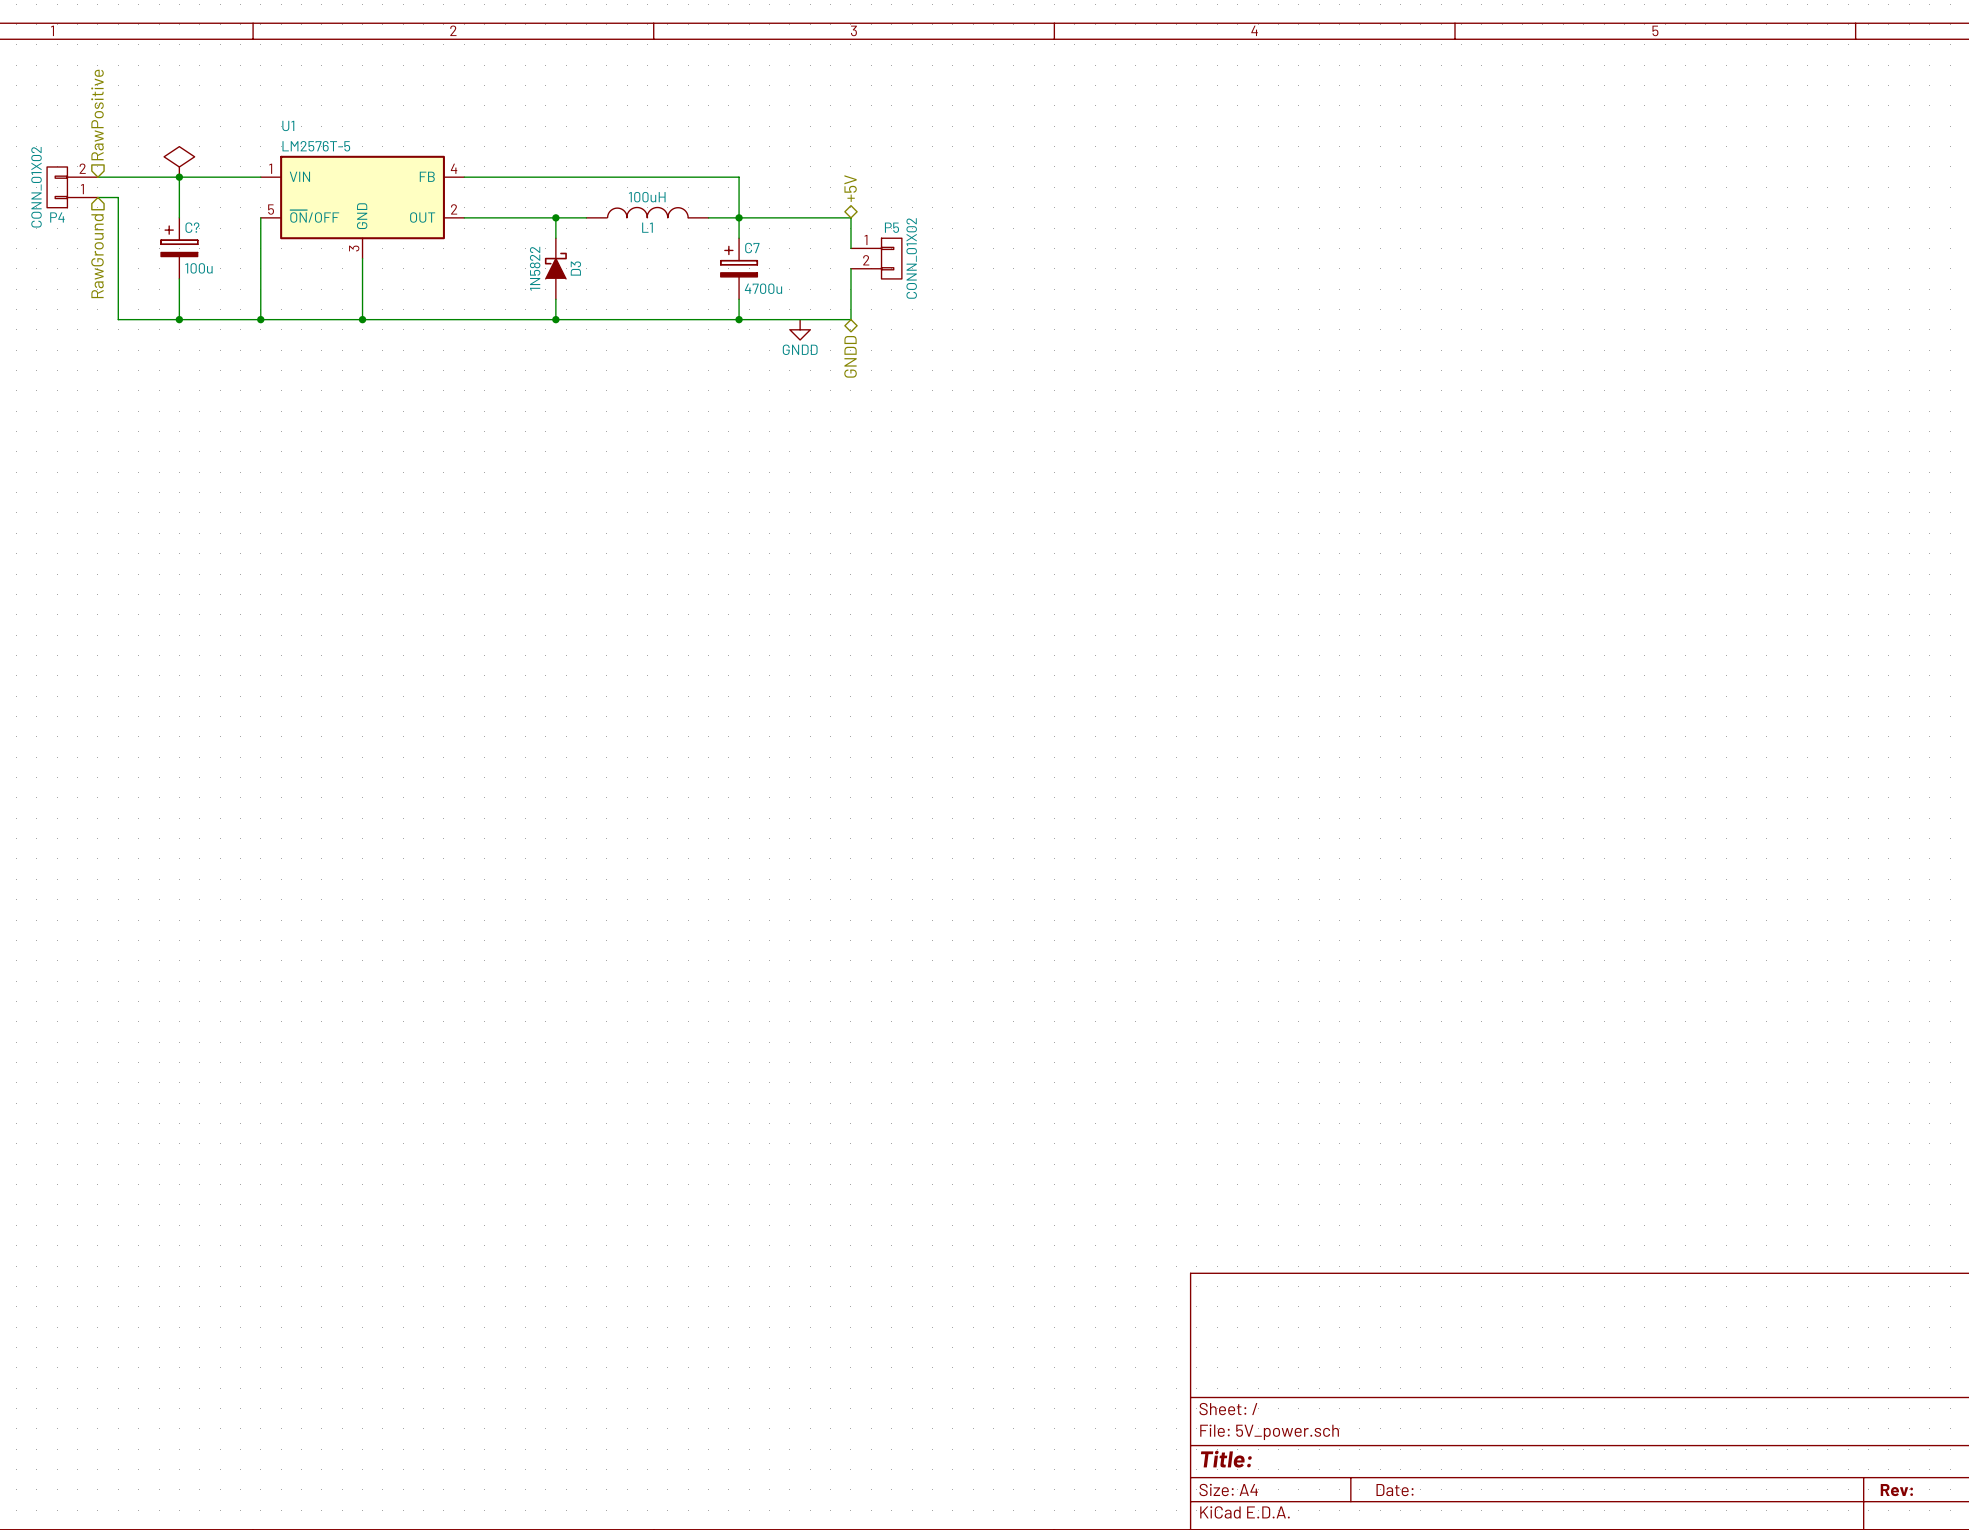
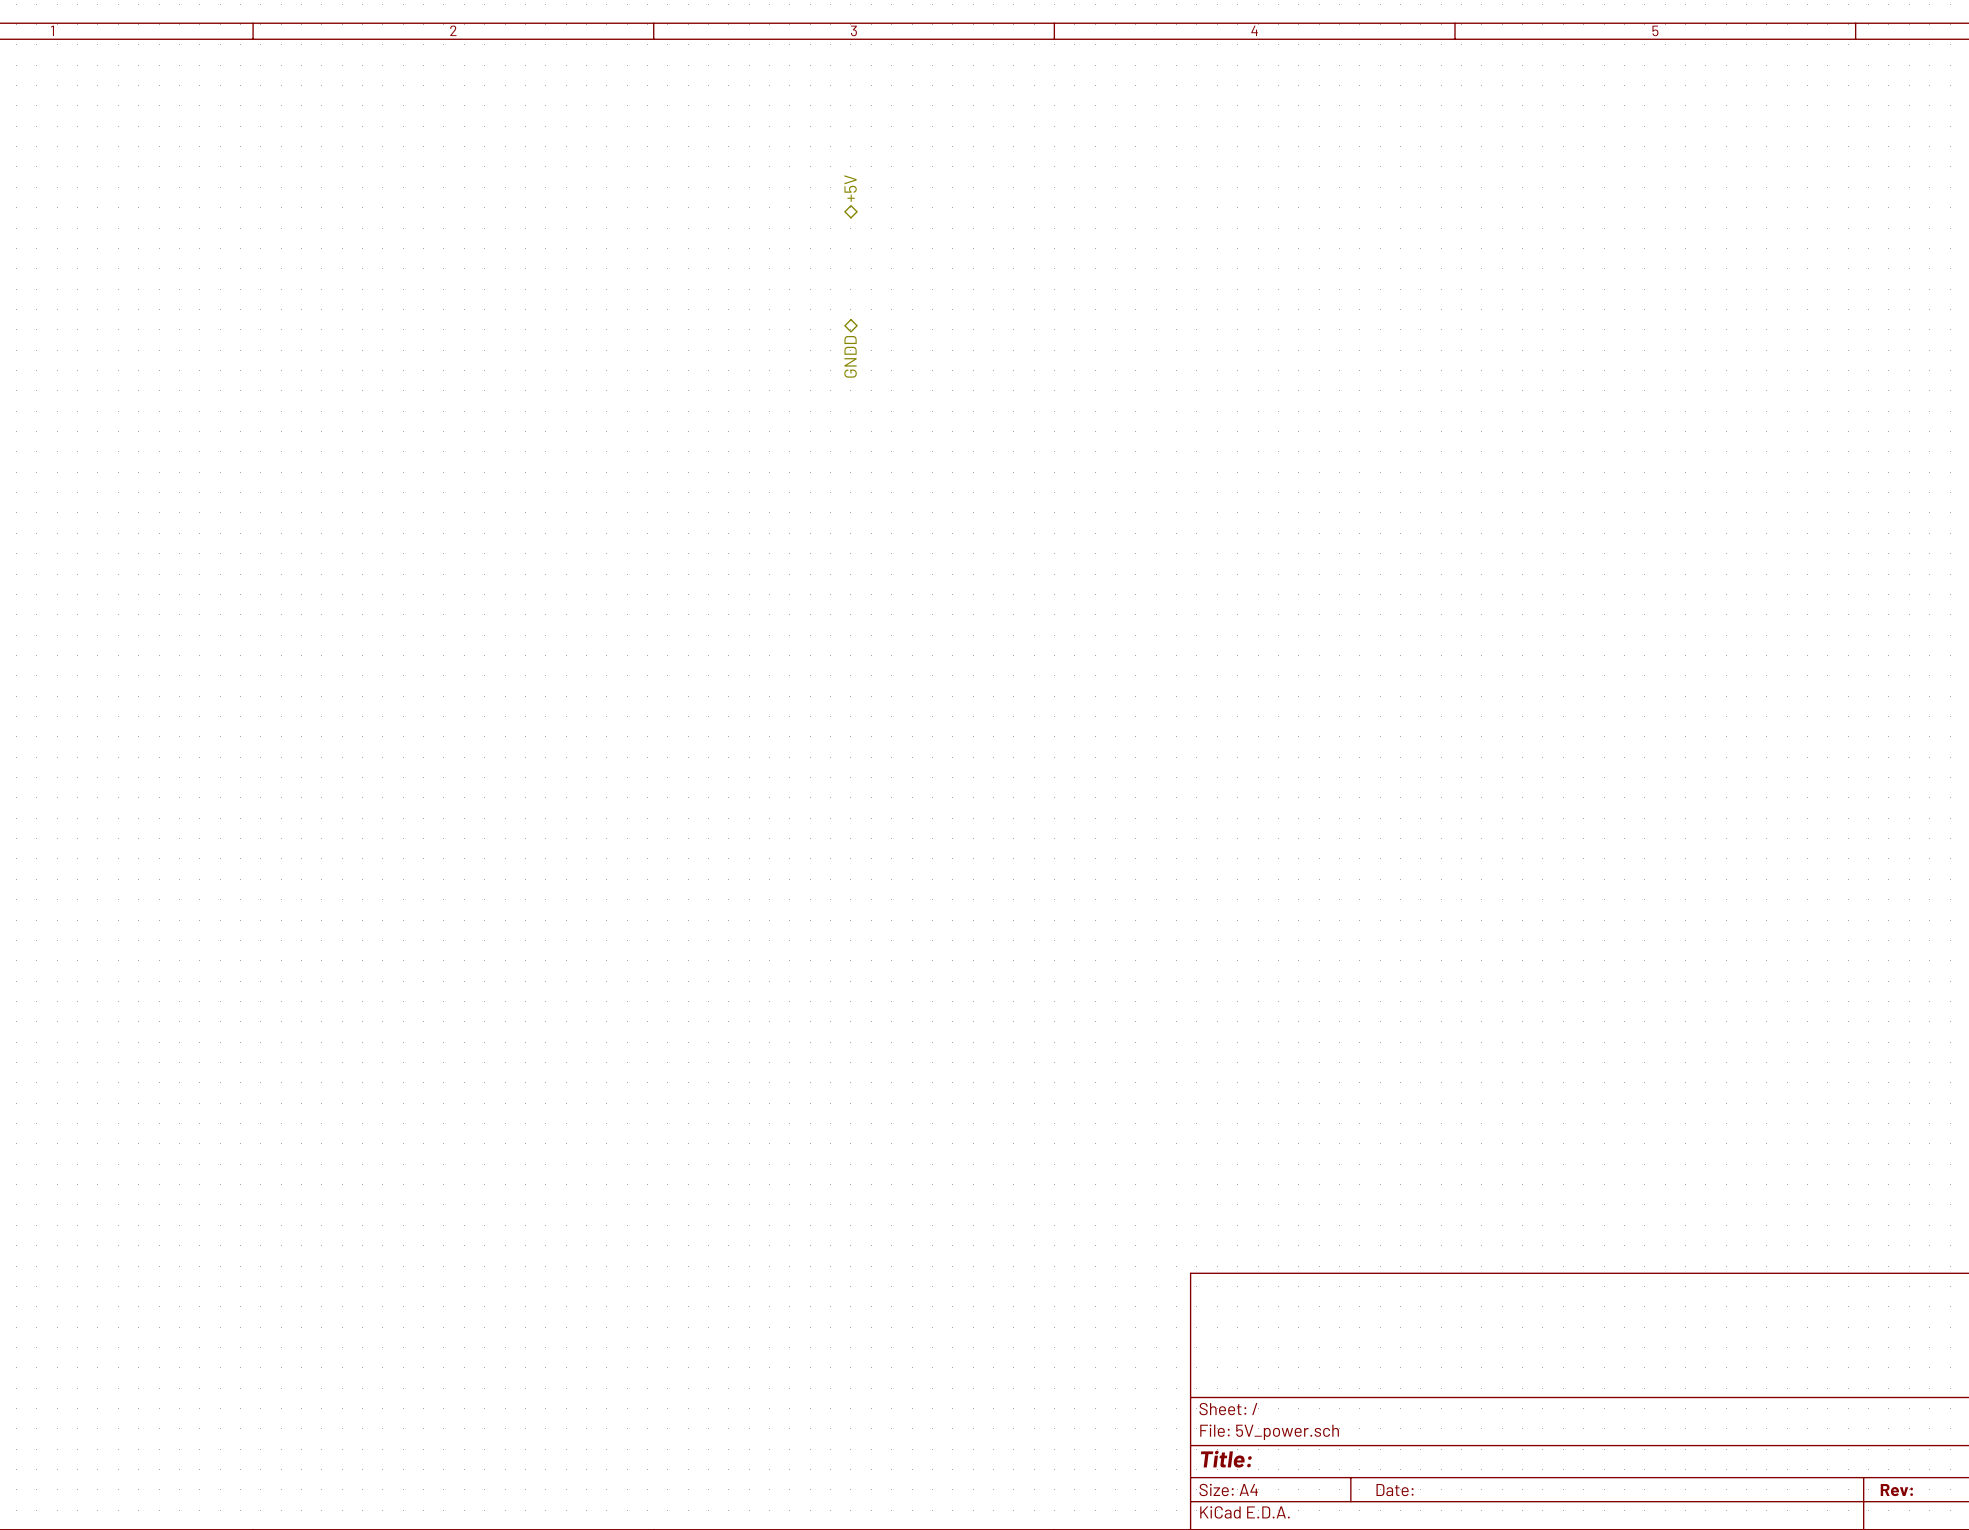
hierarchical label: RawPositive (97, 115) -> none
power symbol: (179, 161) -> none
wire: (97, 177) (260, 177) -> none
wire: (179, 177) (179, 217) -> none
junction: (179, 177) -> none
wire: (464, 177) (739, 177) (739, 238) -> none
P4: CONN_01X02 (72, 187) -> none
wire: (97, 197) (118, 197) (118, 319) (850, 319) (850, 268) -> none
U1: LM2576T-5 (362, 207) -> none
L1: 100uH (647, 212) -> none
wire: (260, 217) (260, 319) -> none
wire: (464, 217) (586, 217) -> none
wire: (555, 217) (555, 238) -> none
junction: (555, 217) -> none
wire: (708, 217) (850, 217) (850, 248) -> none
junction: (739, 217) -> none
C?: 100u (179, 248) -> none
hierarchical label: RawGround (97, 256) -> none
wire: (362, 258) (362, 319) -> none
P5: CONN_01X02 (876, 258) -> none
D3: 1N5822 (555, 268) -> none
C7: 4700u (739, 268) -> none
wire: (179, 278) (179, 319) -> none
wire: (555, 299) (555, 319) -> none
wire: (739, 299) (739, 319) -> none
junction: (179, 319) -> none
junction: (260, 319) -> none
junction: (362, 319) -> none
junction: (555, 319) -> none
junction: (739, 319) -> none
power symbol: GNDD (800, 329) -> none

